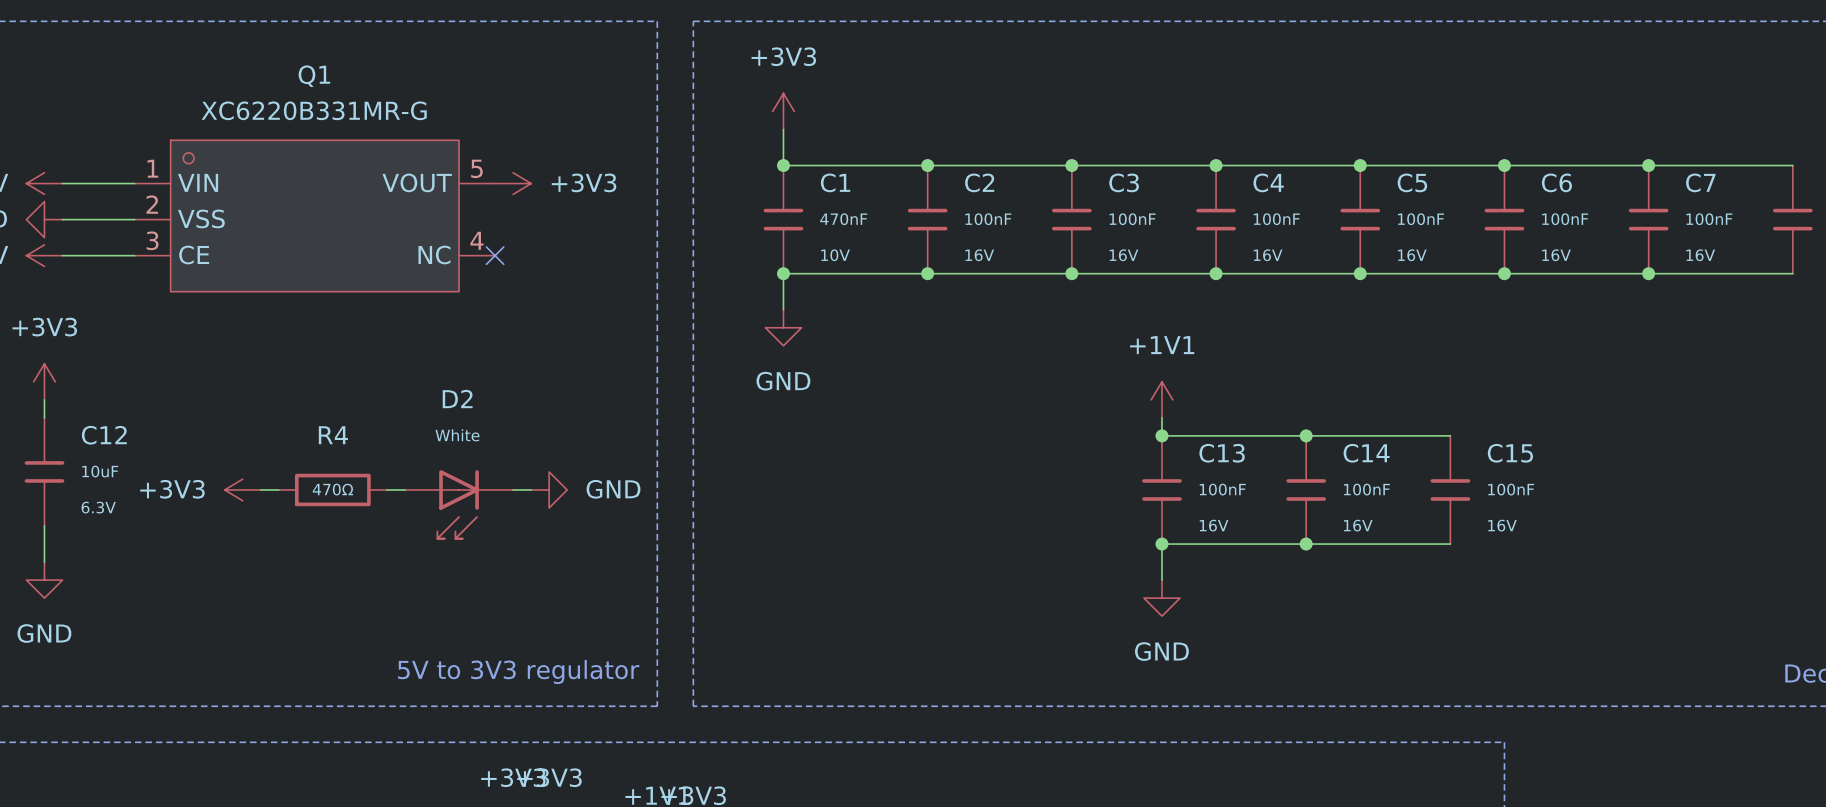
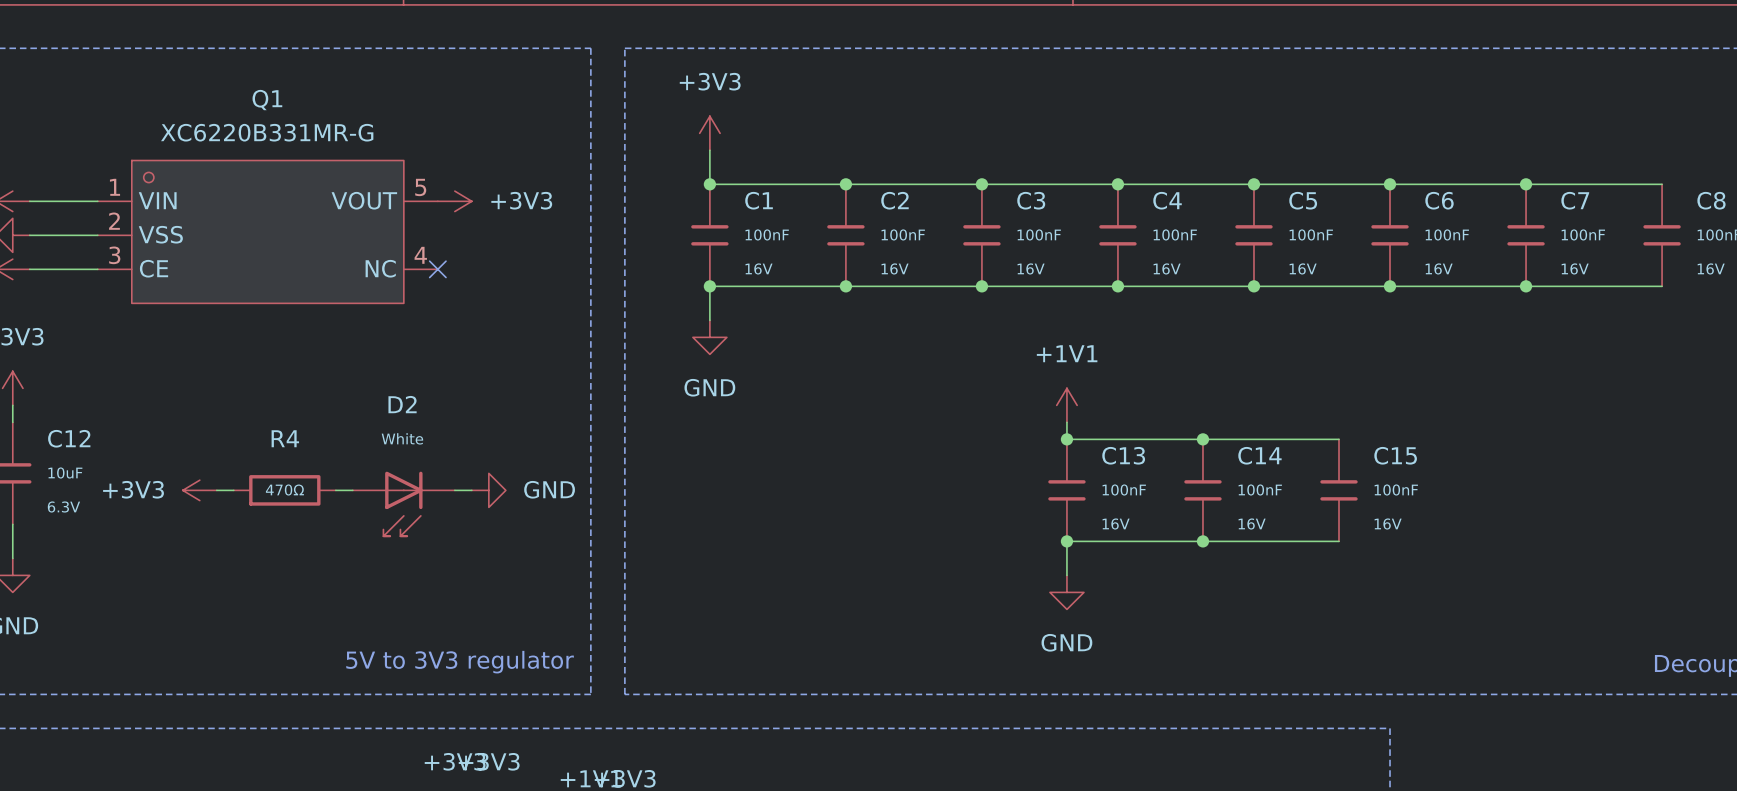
C1 value: 470nF (843, 219) -> 100nF (767, 234)
C1 text: 10V (835, 255) -> 16V (759, 268)

